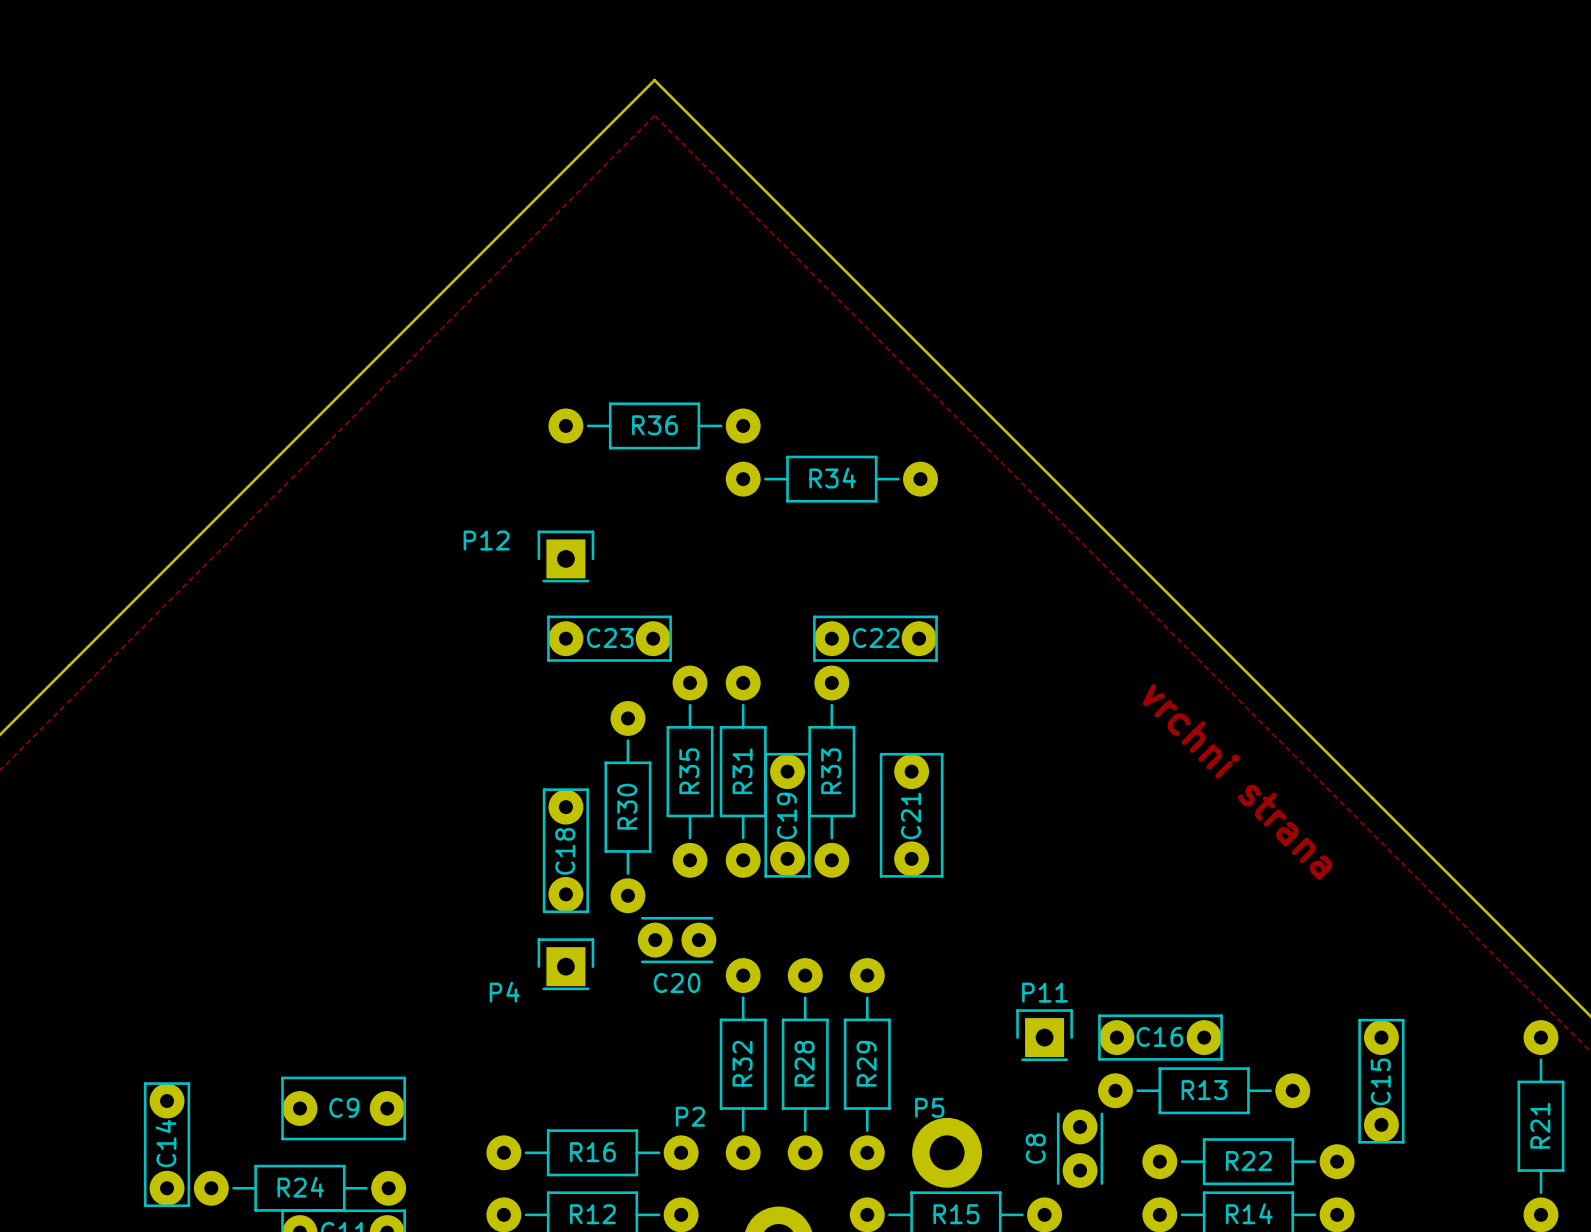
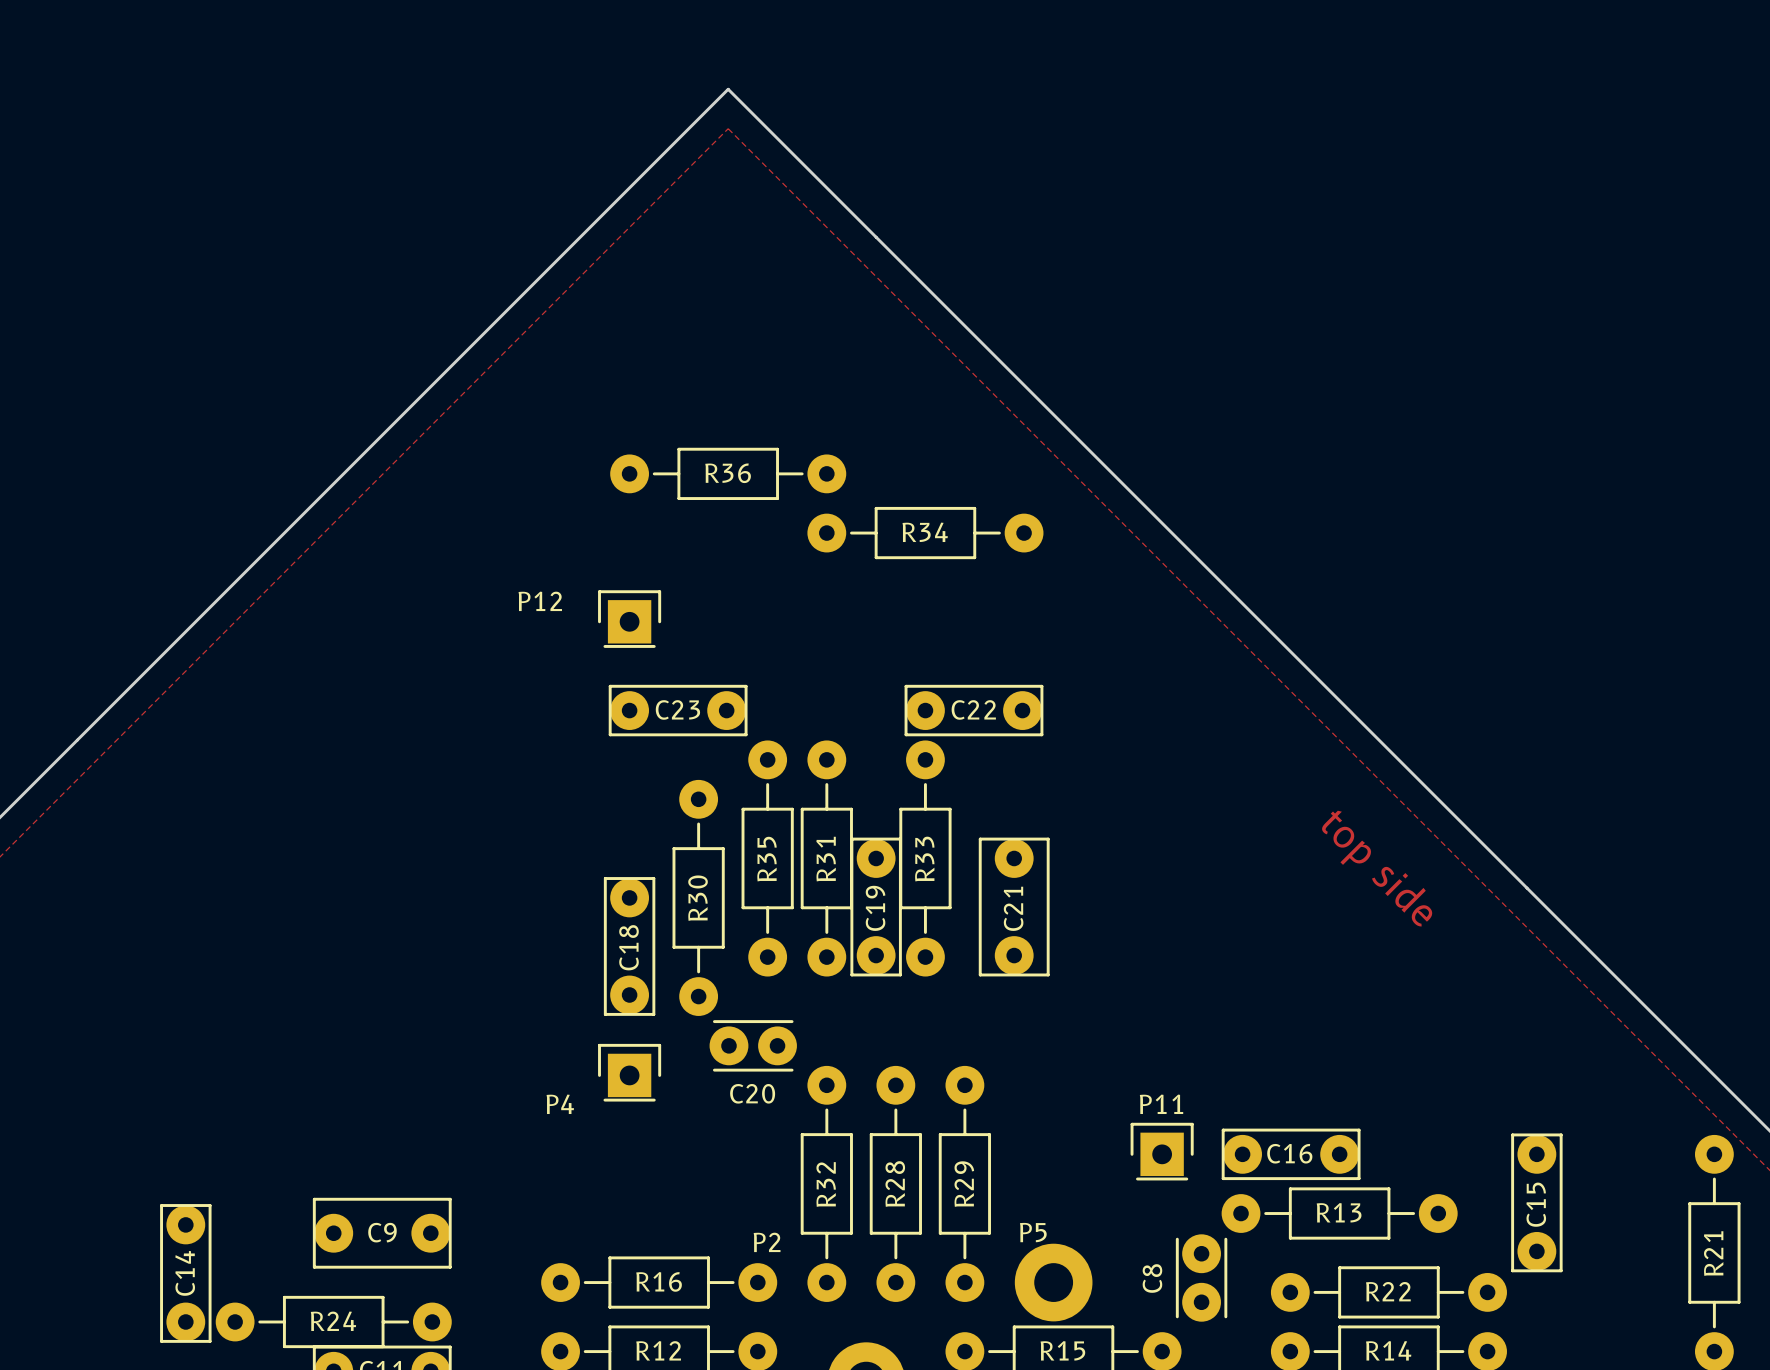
text: vrchni strana (1237, 782) -> top side (1377, 868)

